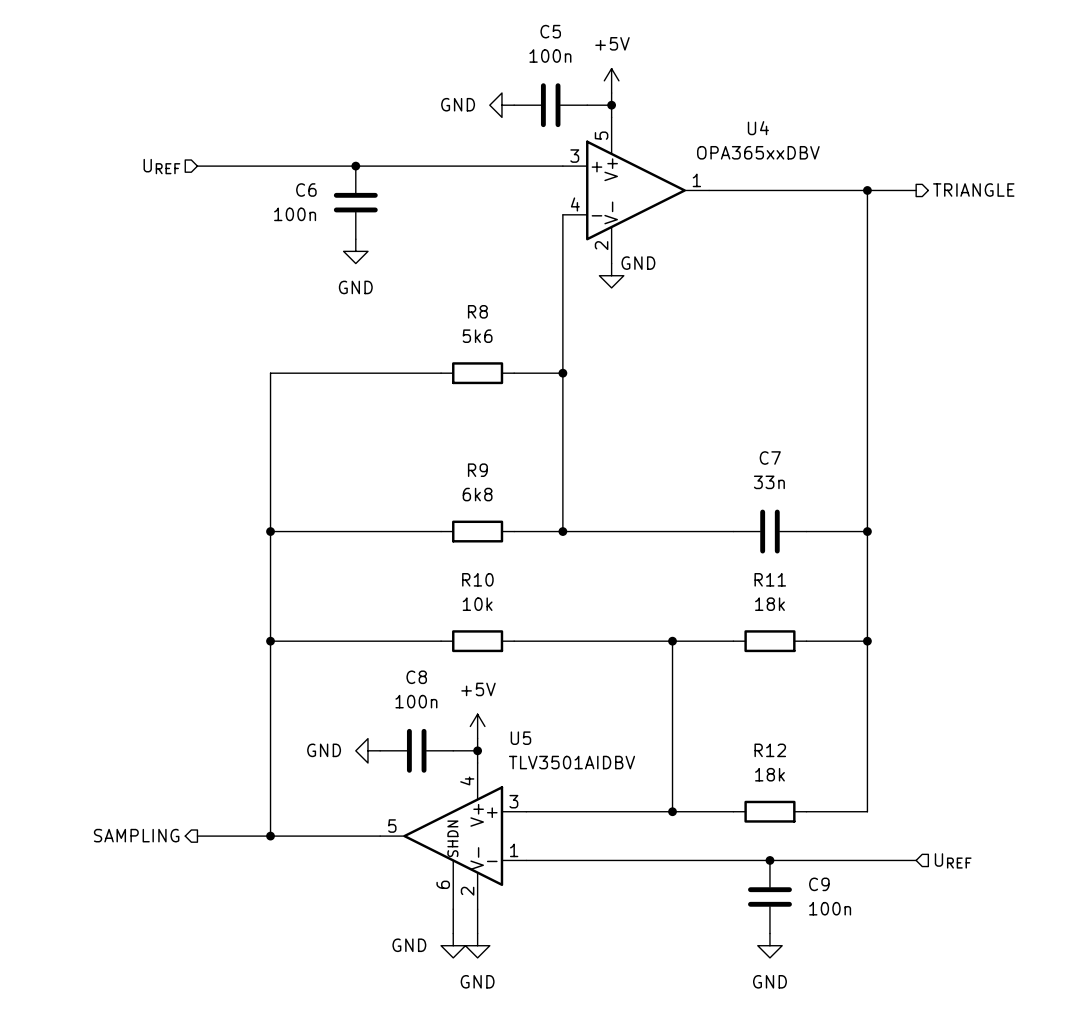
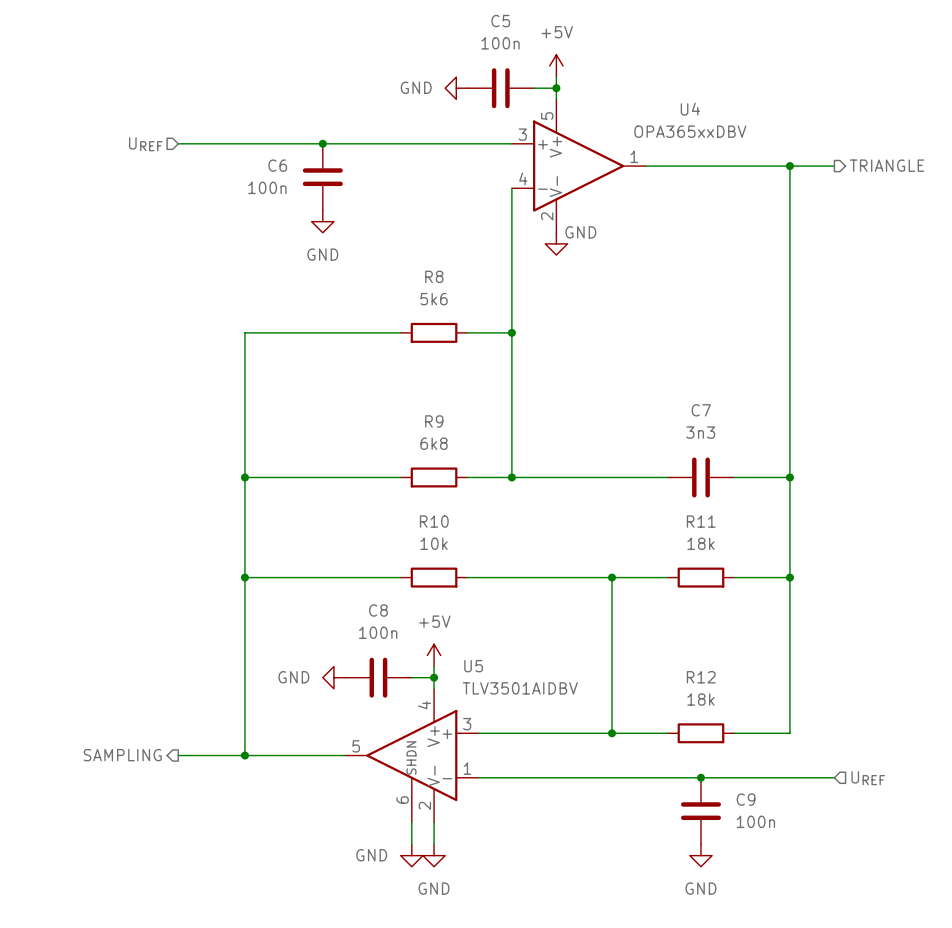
C7 value: 33n (769, 482) -> 3n3 (700, 432)

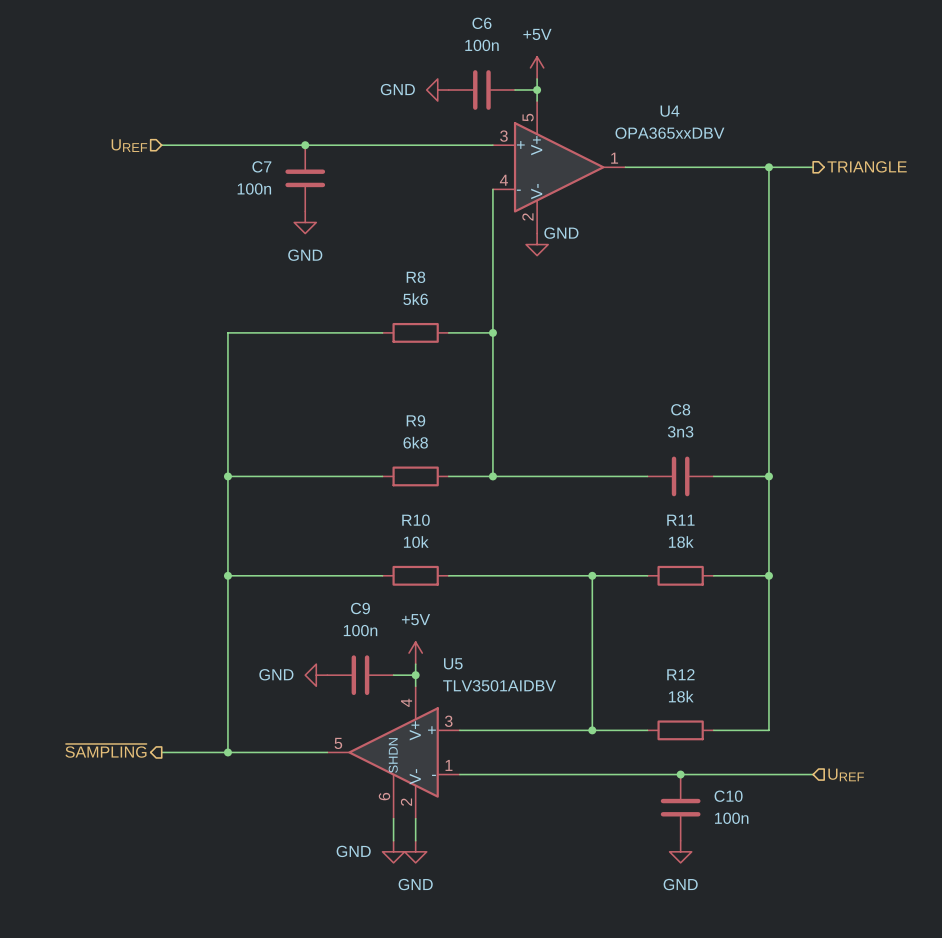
C5 name: C5 (500, 21) -> C6 (481, 23)
C6 name: C6 (277, 165) -> C7 (261, 166)
C7 name: C7 (701, 410) -> C8 (680, 409)
C8 name: C8 (378, 610) -> C9 (360, 608)
hierarchical label: SAMPLING (122, 755) -> ~{SAMPLING} (106, 750)
C9 name: C9 (746, 799) -> C10 (728, 796)

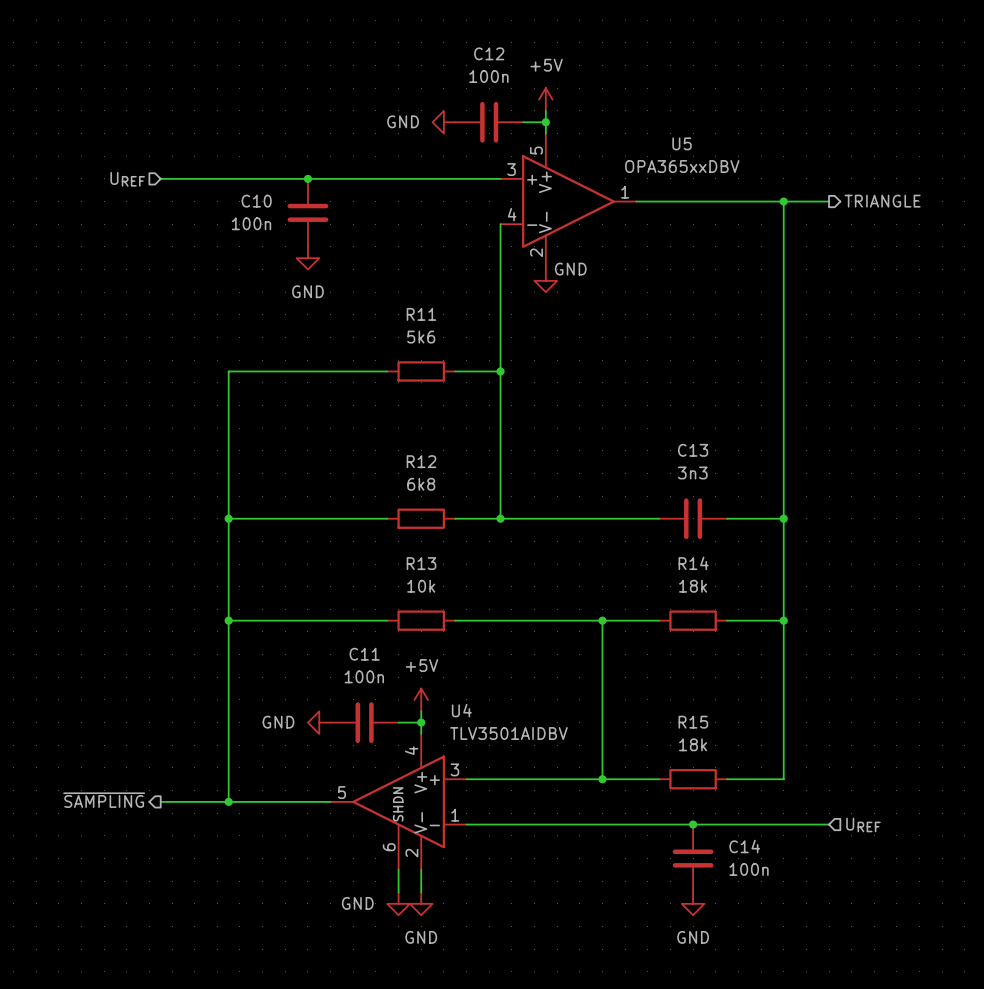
C6 name: C6 (481, 23) -> C12 (489, 53)
U4 name: U4 (669, 111) -> U5 (682, 143)
C7 name: C7 (261, 166) -> C10 (256, 201)
R8 name: R8 (415, 277) -> R11 (421, 314)
C8 name: C8 (680, 409) -> C13 (693, 450)
R9 name: R9 (415, 420) -> R12 (421, 461)
R10 name: R10 (416, 520) -> R13 (421, 563)
R11 name: R11 (680, 520) -> R14 (693, 563)
C9 name: C9 (360, 608) -> C11 (364, 654)
U5 name: U5 (453, 663) -> U4 (461, 710)
R12 name: R12 (680, 674) -> R15 (693, 722)
C10 name: C10 (728, 796) -> C14 (744, 846)

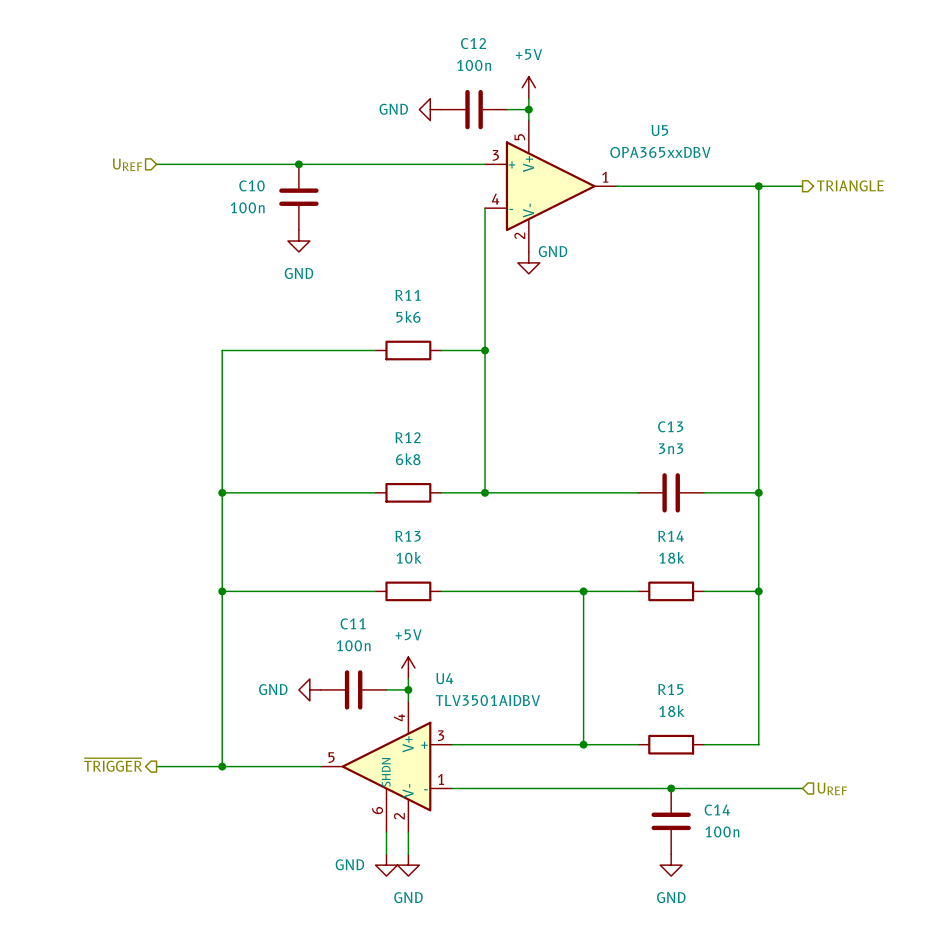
hierarchical label: ~{SAMPLING} (104, 800) -> ~{TRIGGER} (113, 764)

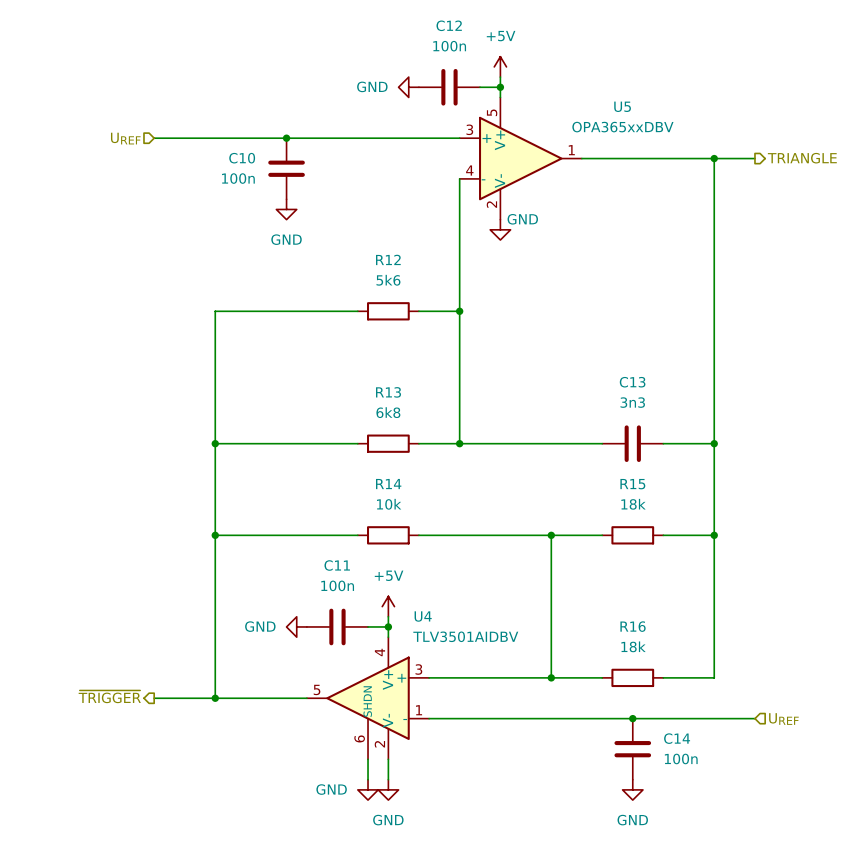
R11 name: R11 (408, 295) -> R12 (388, 259)
R12 name: R12 (408, 437) -> R13 (388, 392)
R13 name: R13 (408, 536) -> R14 (388, 484)
R14 name: R14 (671, 536) -> R15 (632, 484)
R15 name: R15 (670, 689) -> R16 (633, 626)

